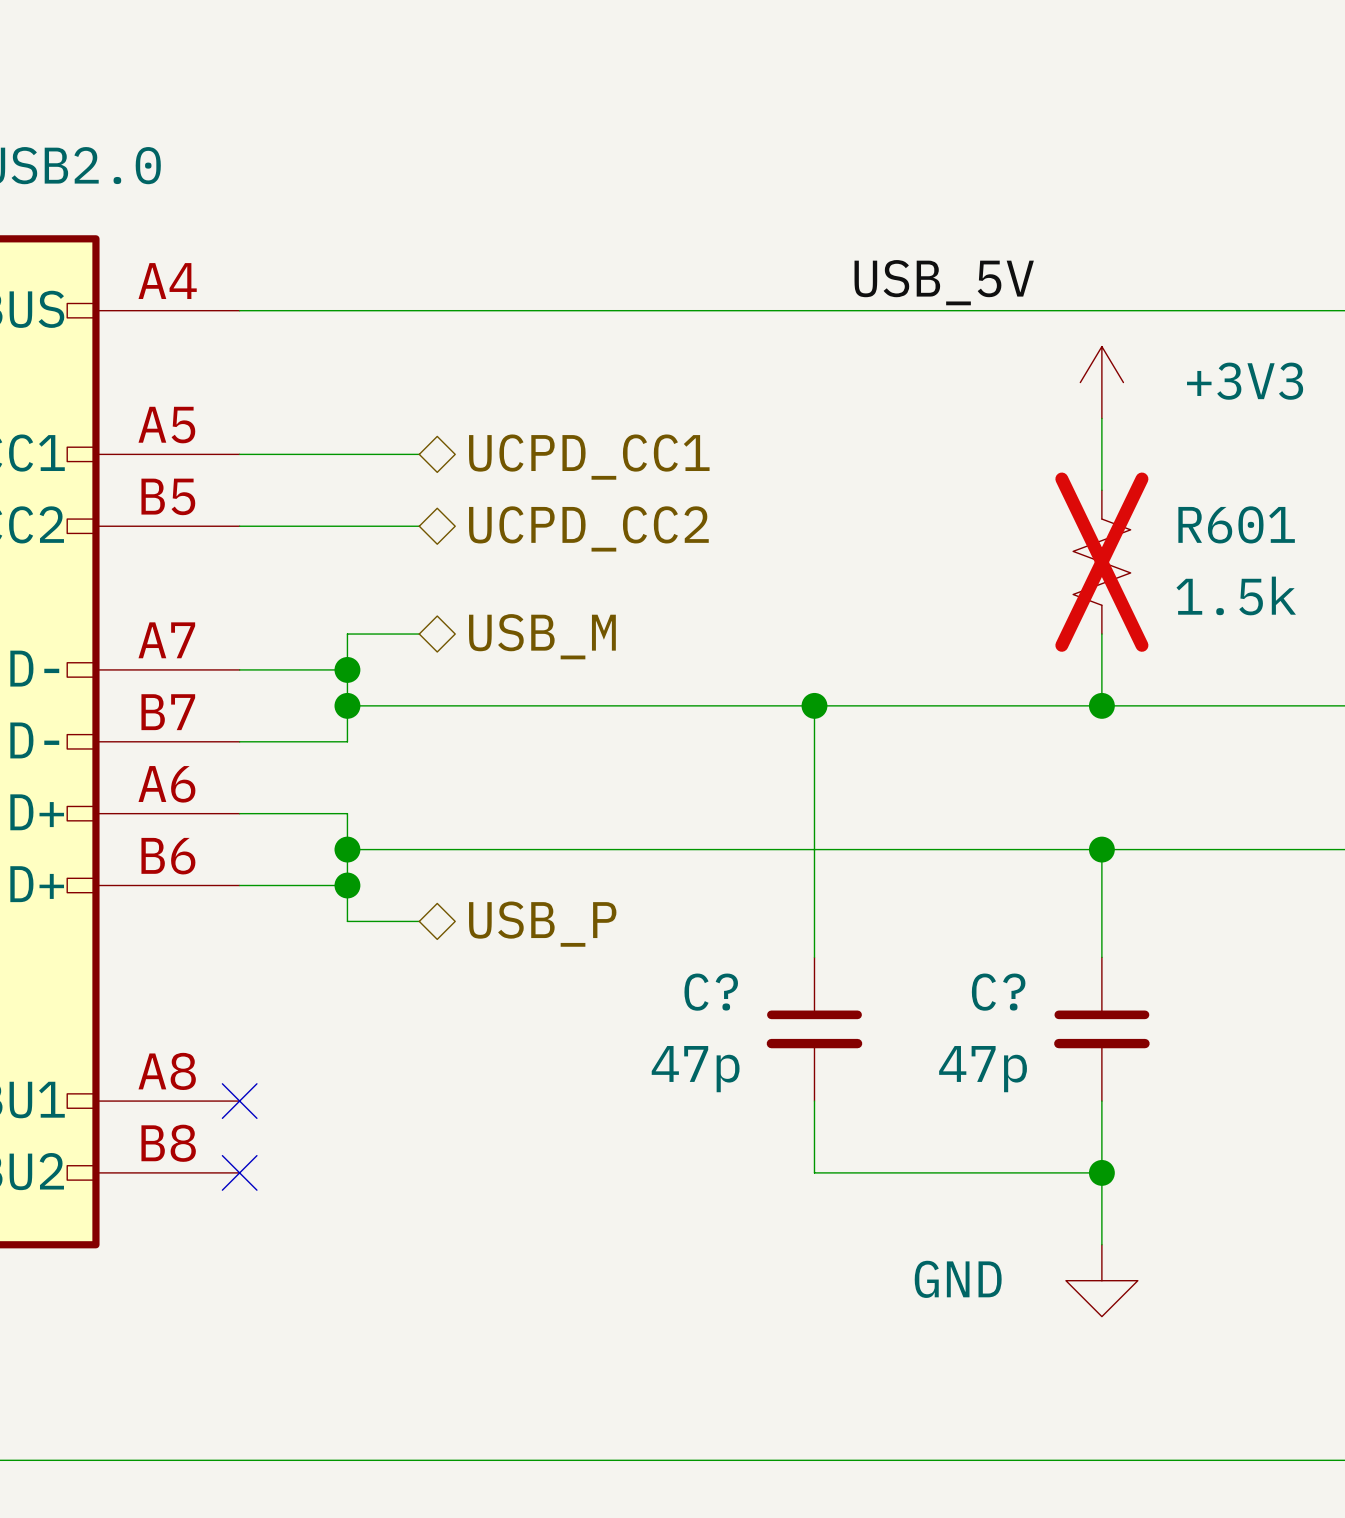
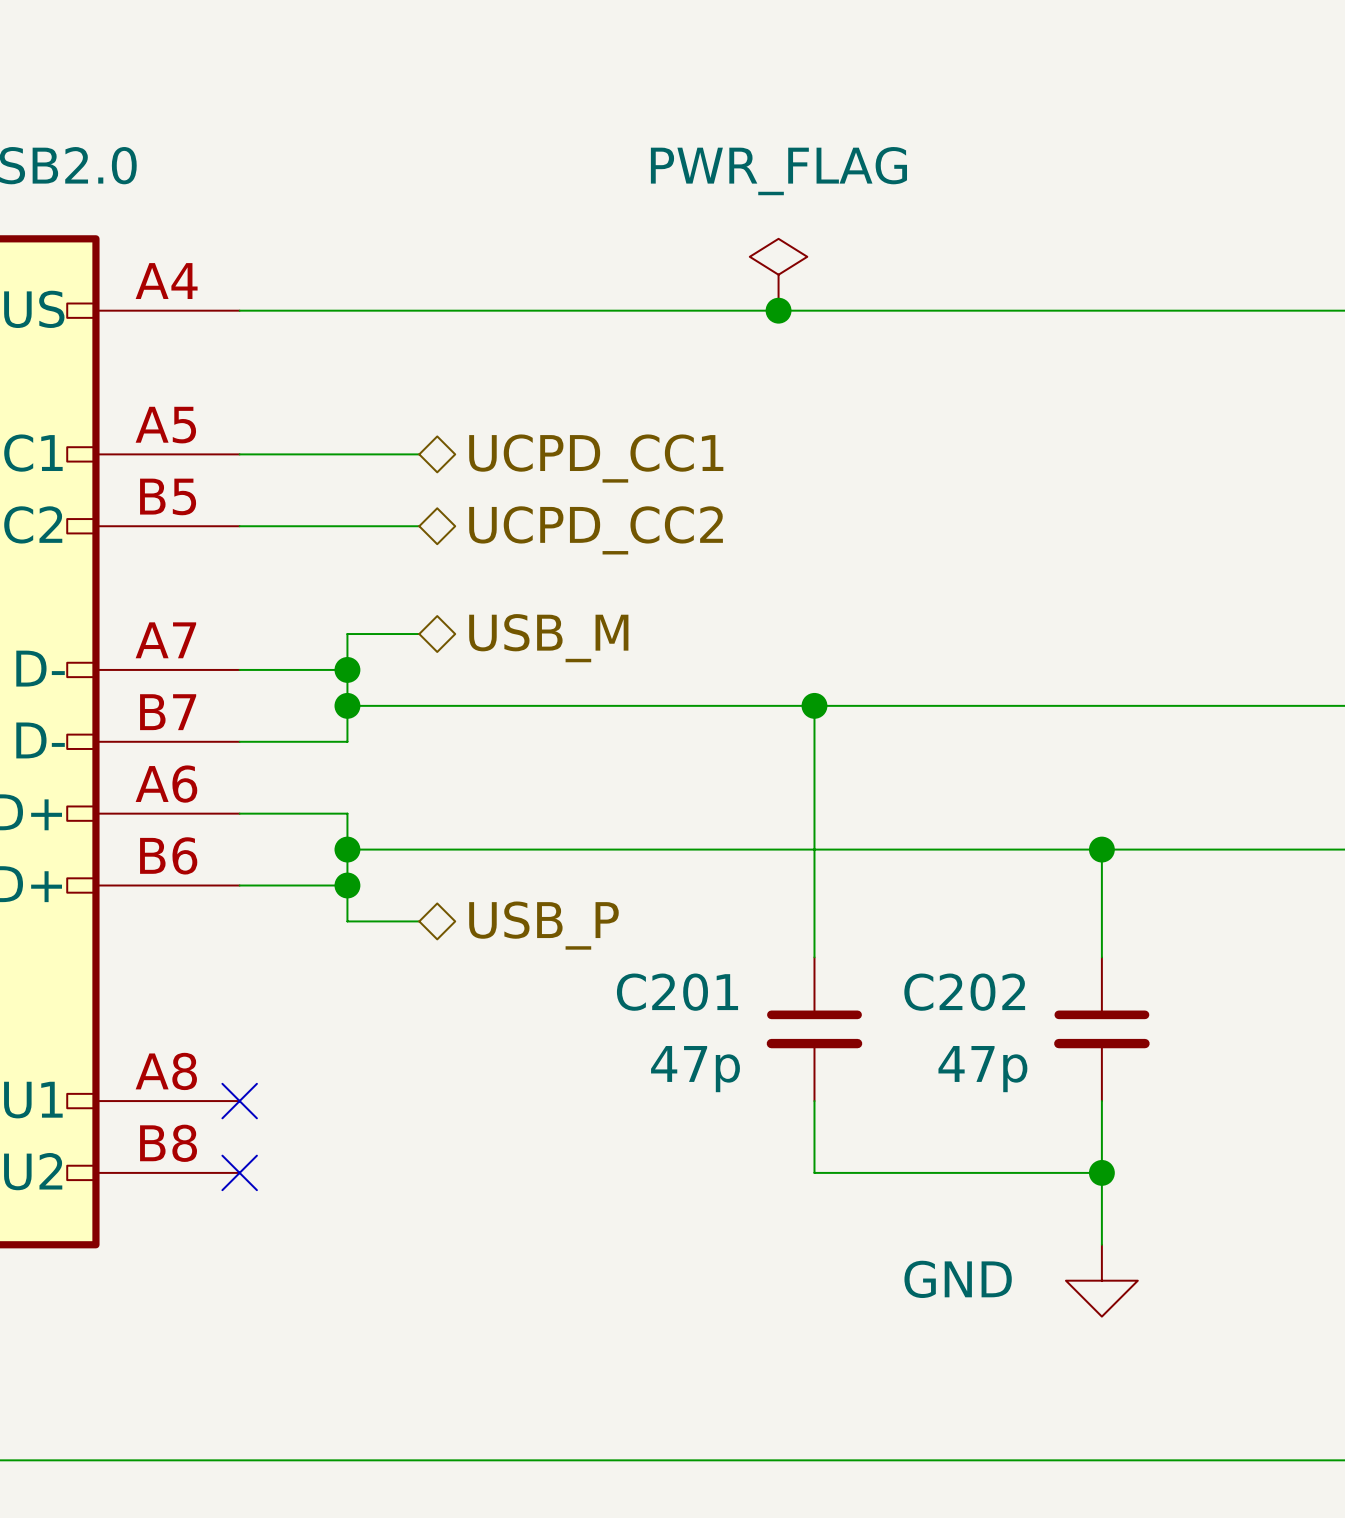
power symbol: none -> PWR_FLAG (778, 274)
label: USB_5V (944, 282) -> none
junction: none -> (778, 310)
power symbol: +3V3 (1101, 382) -> none
wire: (1101, 418) (1101, 490) -> none
R601: 1.5k (1101, 562) -> none
wire: (1101, 634) (1101, 705) -> none
junction: (1101, 705) -> none
C? name: C? (711, 992) -> C201 (677, 992)
C? name: C? (998, 992) -> C202 (964, 992)

